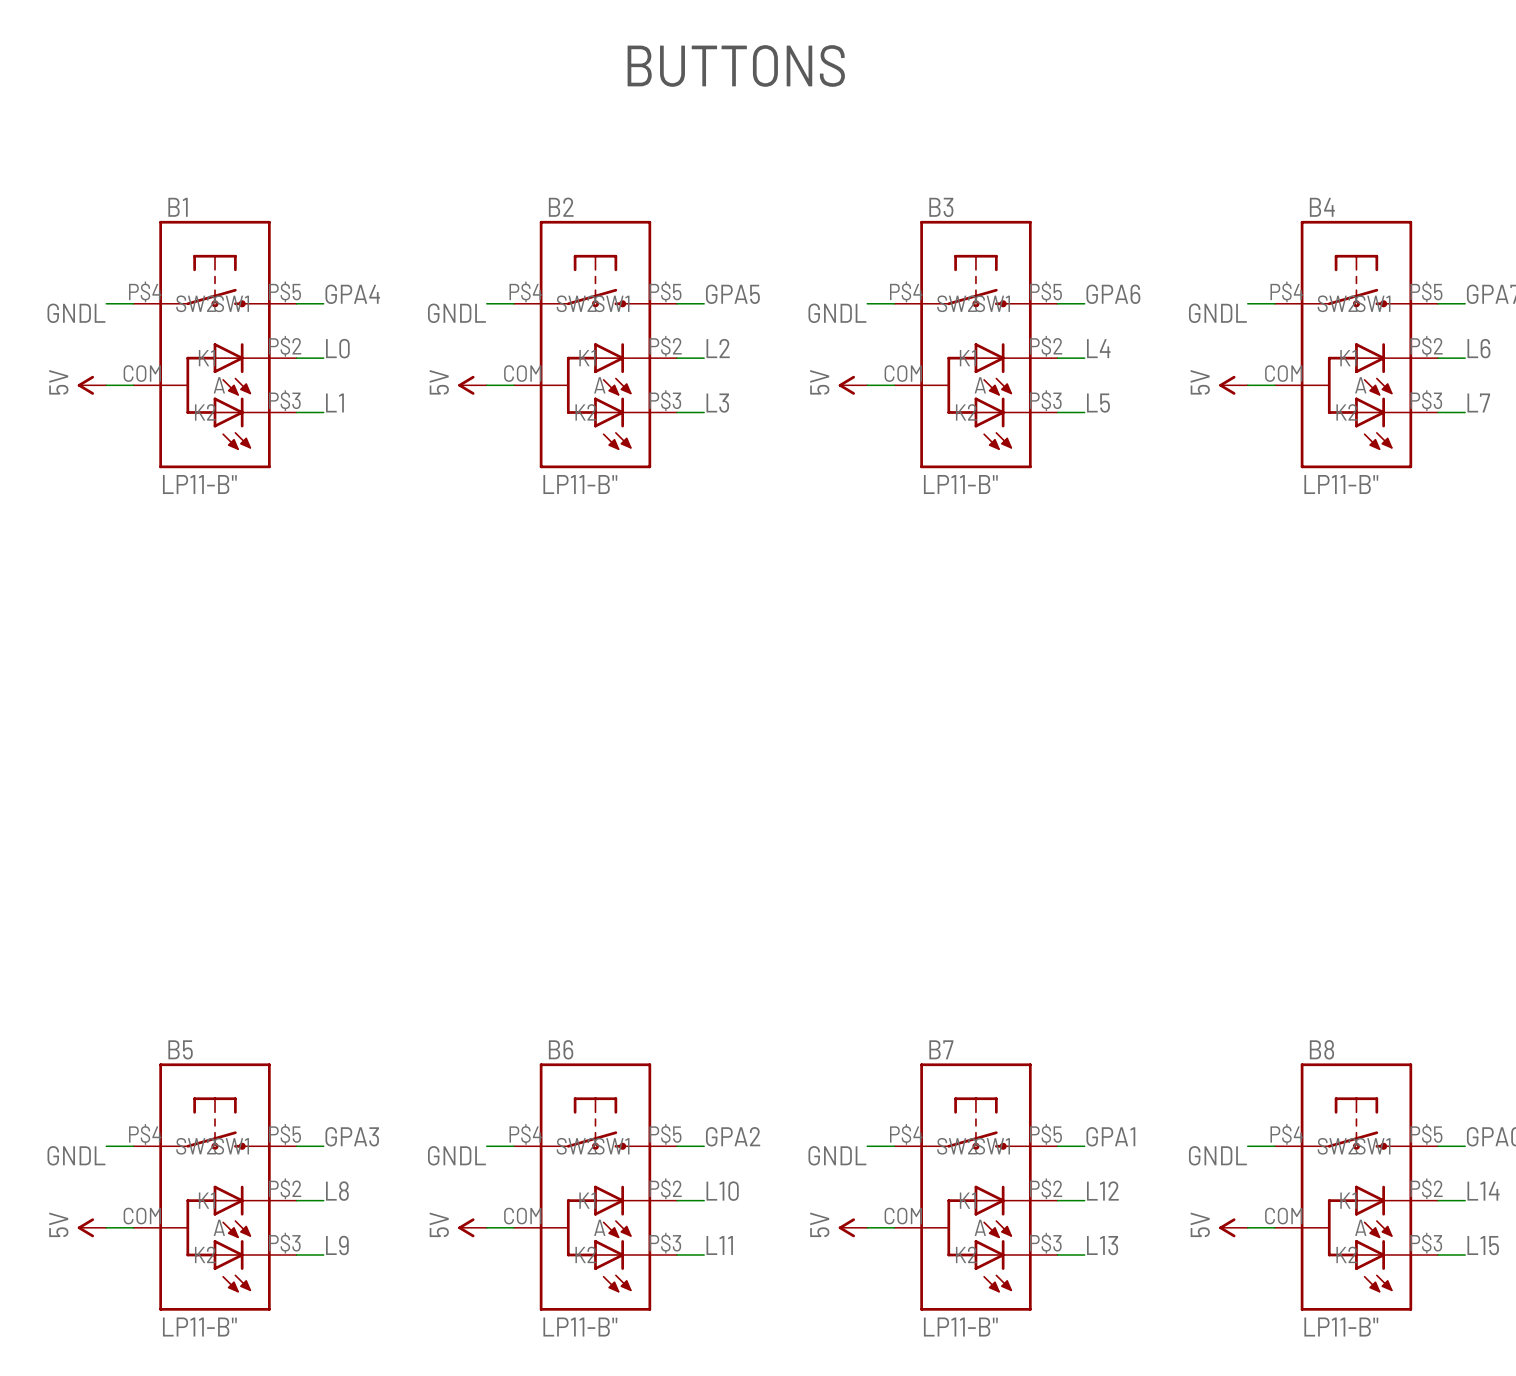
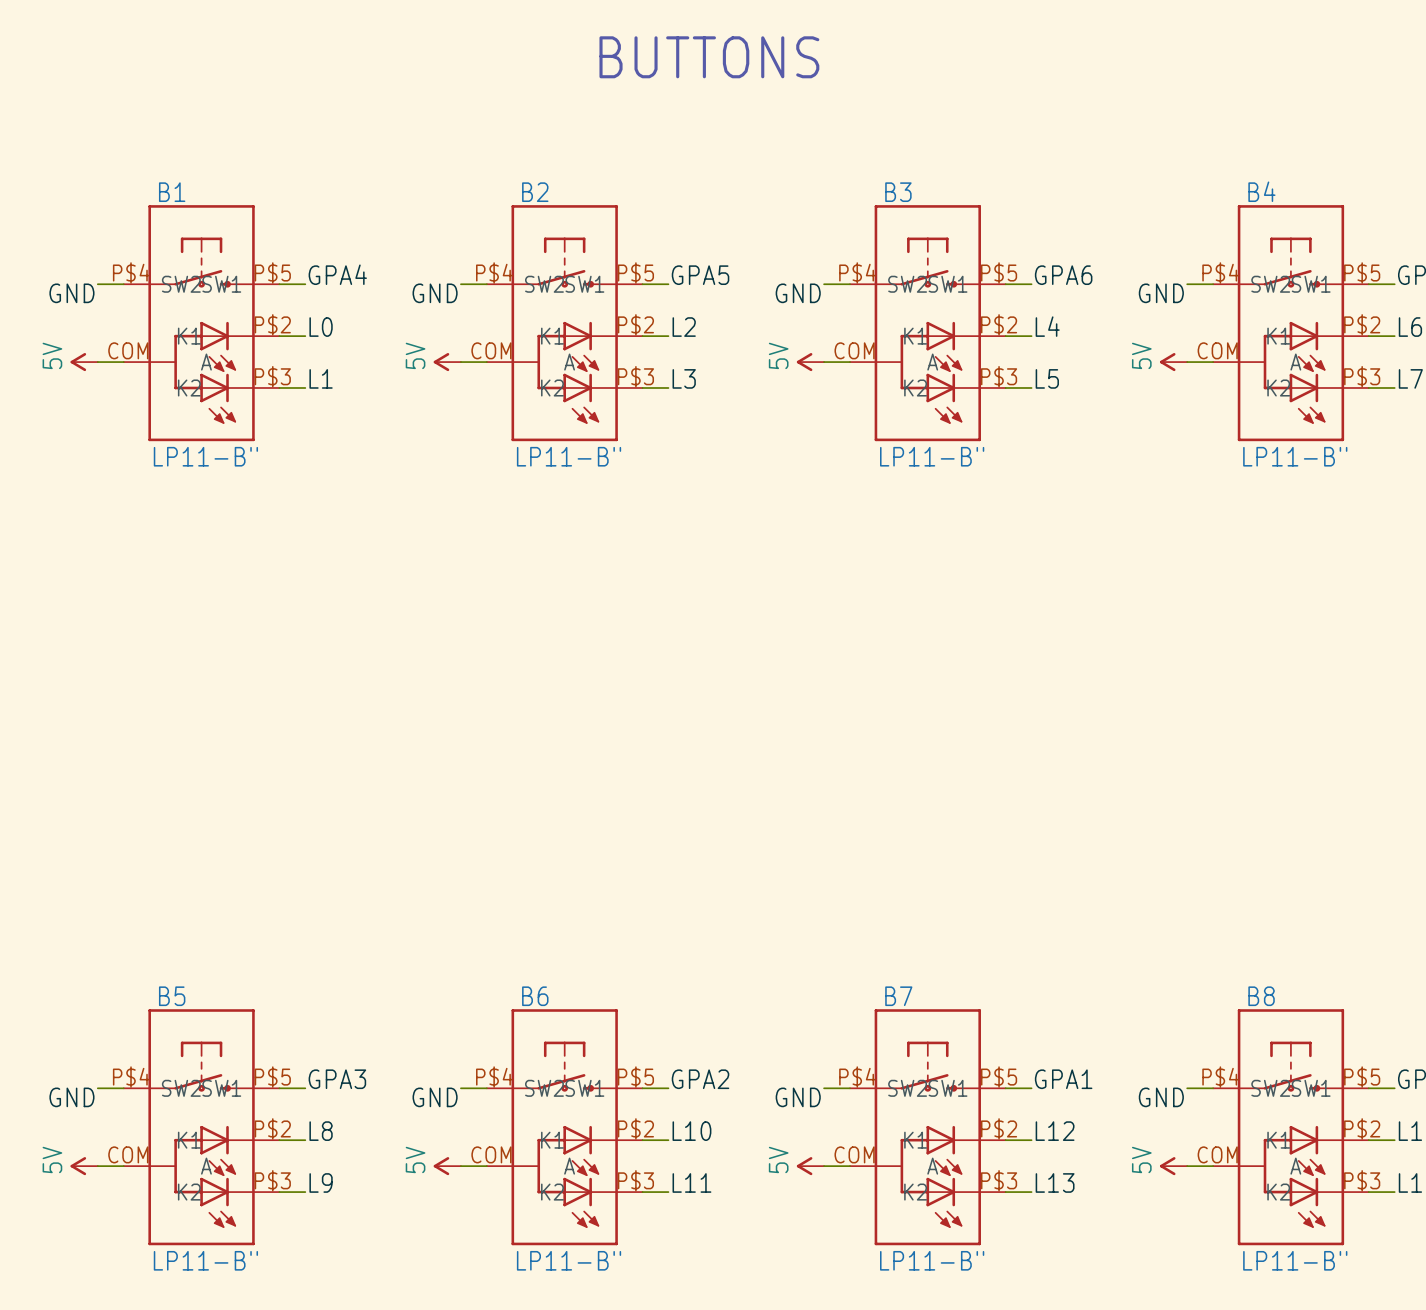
label: GNDL (76, 313) -> GND (71, 293)
label: GNDL (456, 313) -> GND (435, 293)
label: GNDL (837, 313) -> GND (798, 293)
label: GNDL (1217, 313) -> GND (1161, 293)
label: GNDL (76, 1155) -> GND (71, 1097)
label: GNDL (456, 1155) -> GND (435, 1097)
label: GNDL (837, 1155) -> GND (798, 1097)
label: GNDL (1217, 1155) -> GND (1161, 1097)

